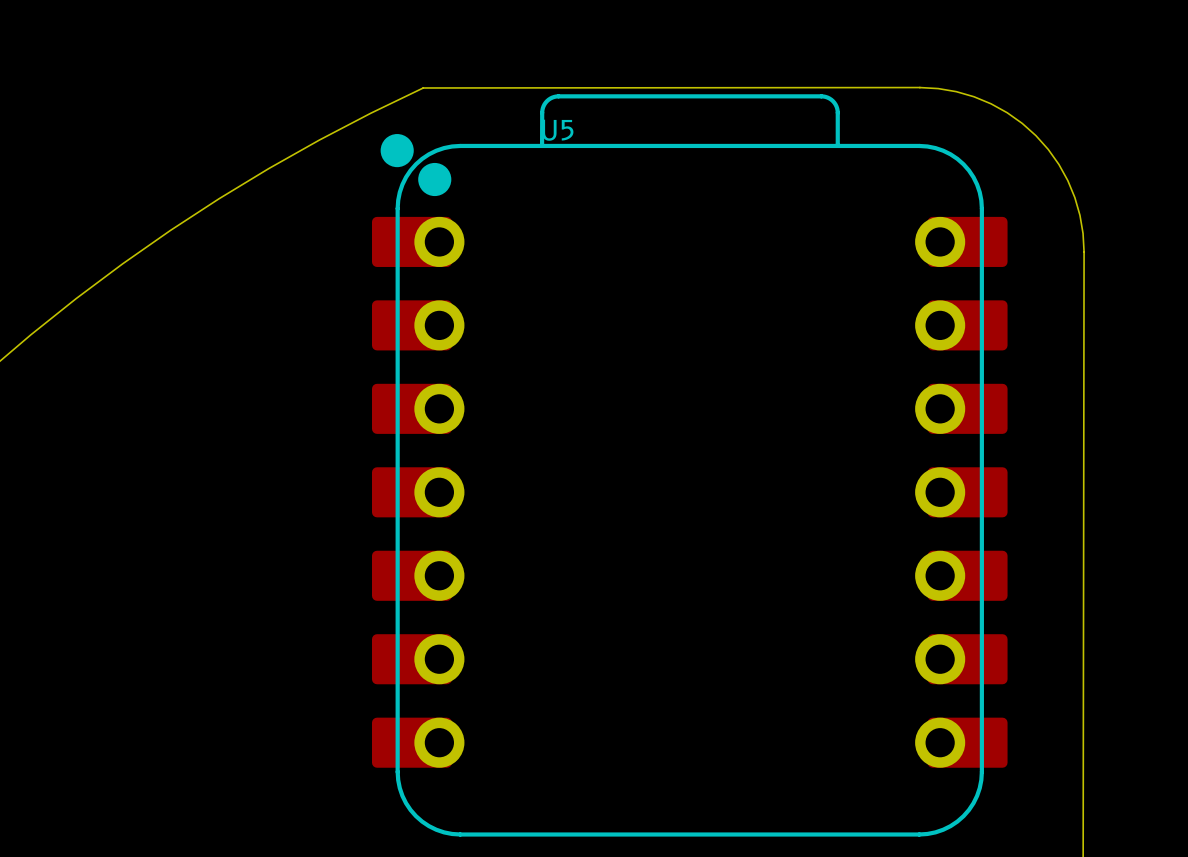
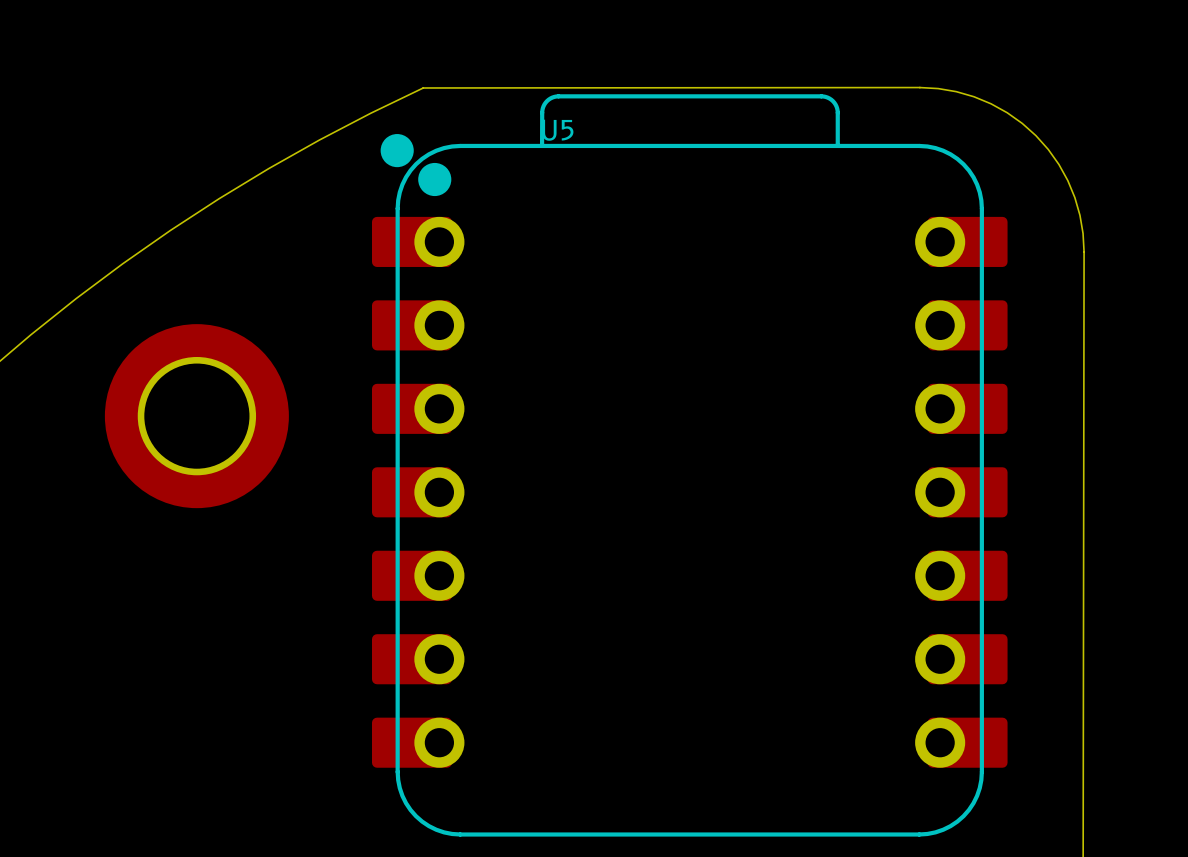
part: none -> (196, 416)

